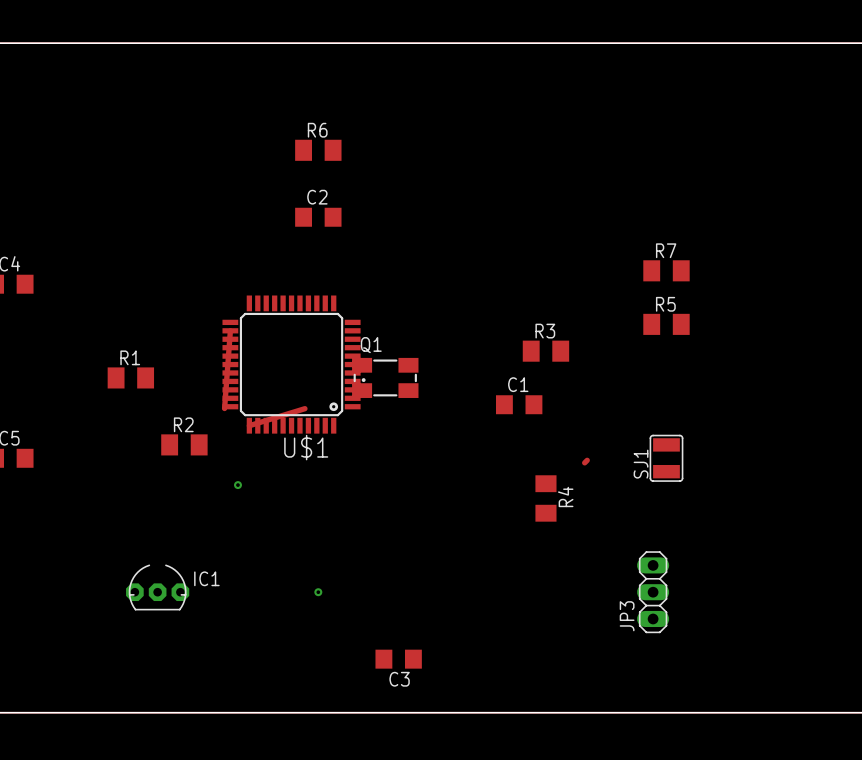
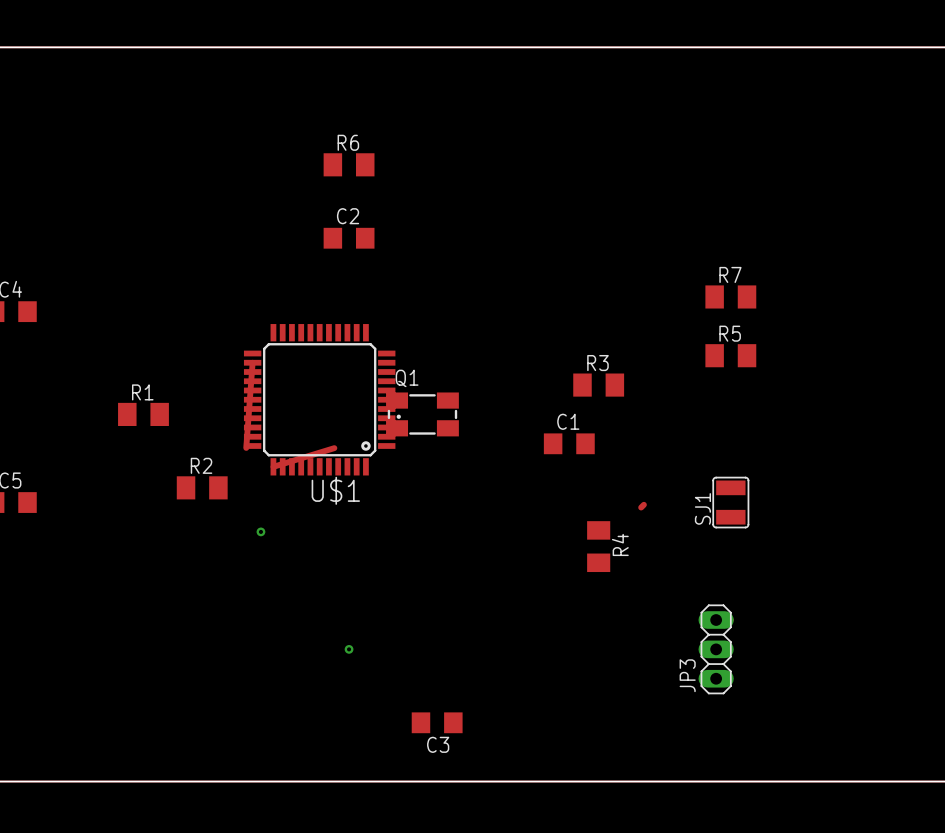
IC1: (157, 587) -> none

